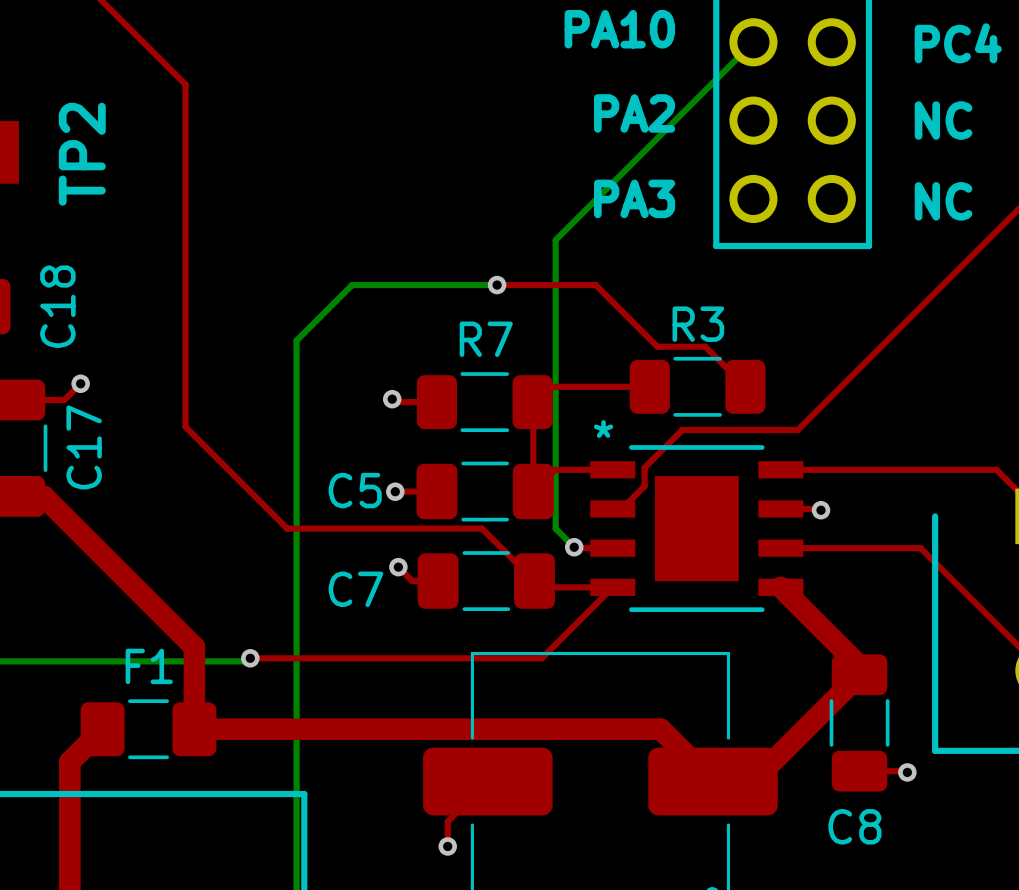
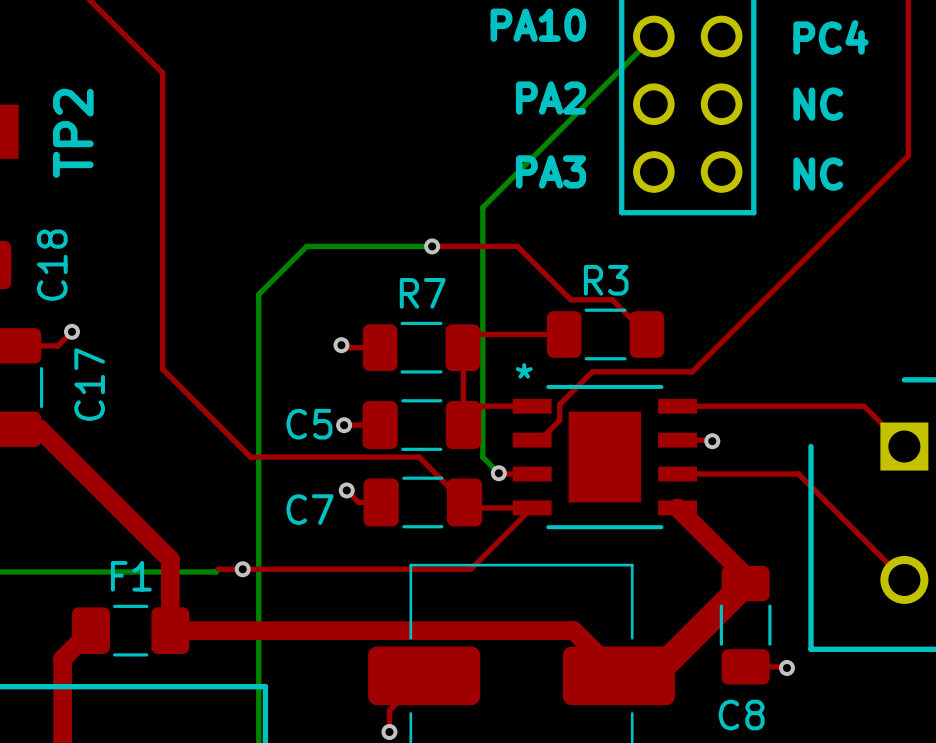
C17 name position: C17 (84, 447) -> C17 (89, 384)
via position: (250, 658) -> (242, 569)
top track width: thin (859, 674) (752, 781) -> thick (745, 583) (653, 675)

